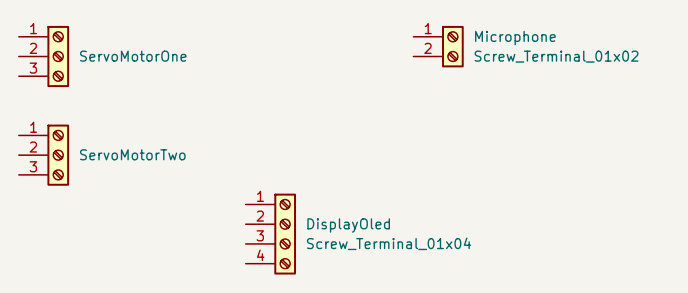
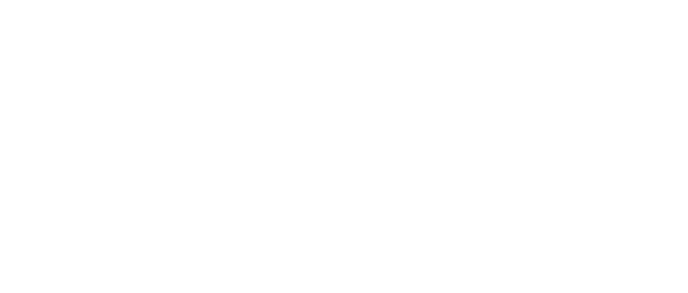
Microphone: Screw_Terminal_01x02 (438, 46) -> none
ServoMotorOne: (43, 56) -> none
ServoMotorTwo: (43, 155) -> none
DisplayOled: Screw_Terminal_01x04 (270, 234) -> none

